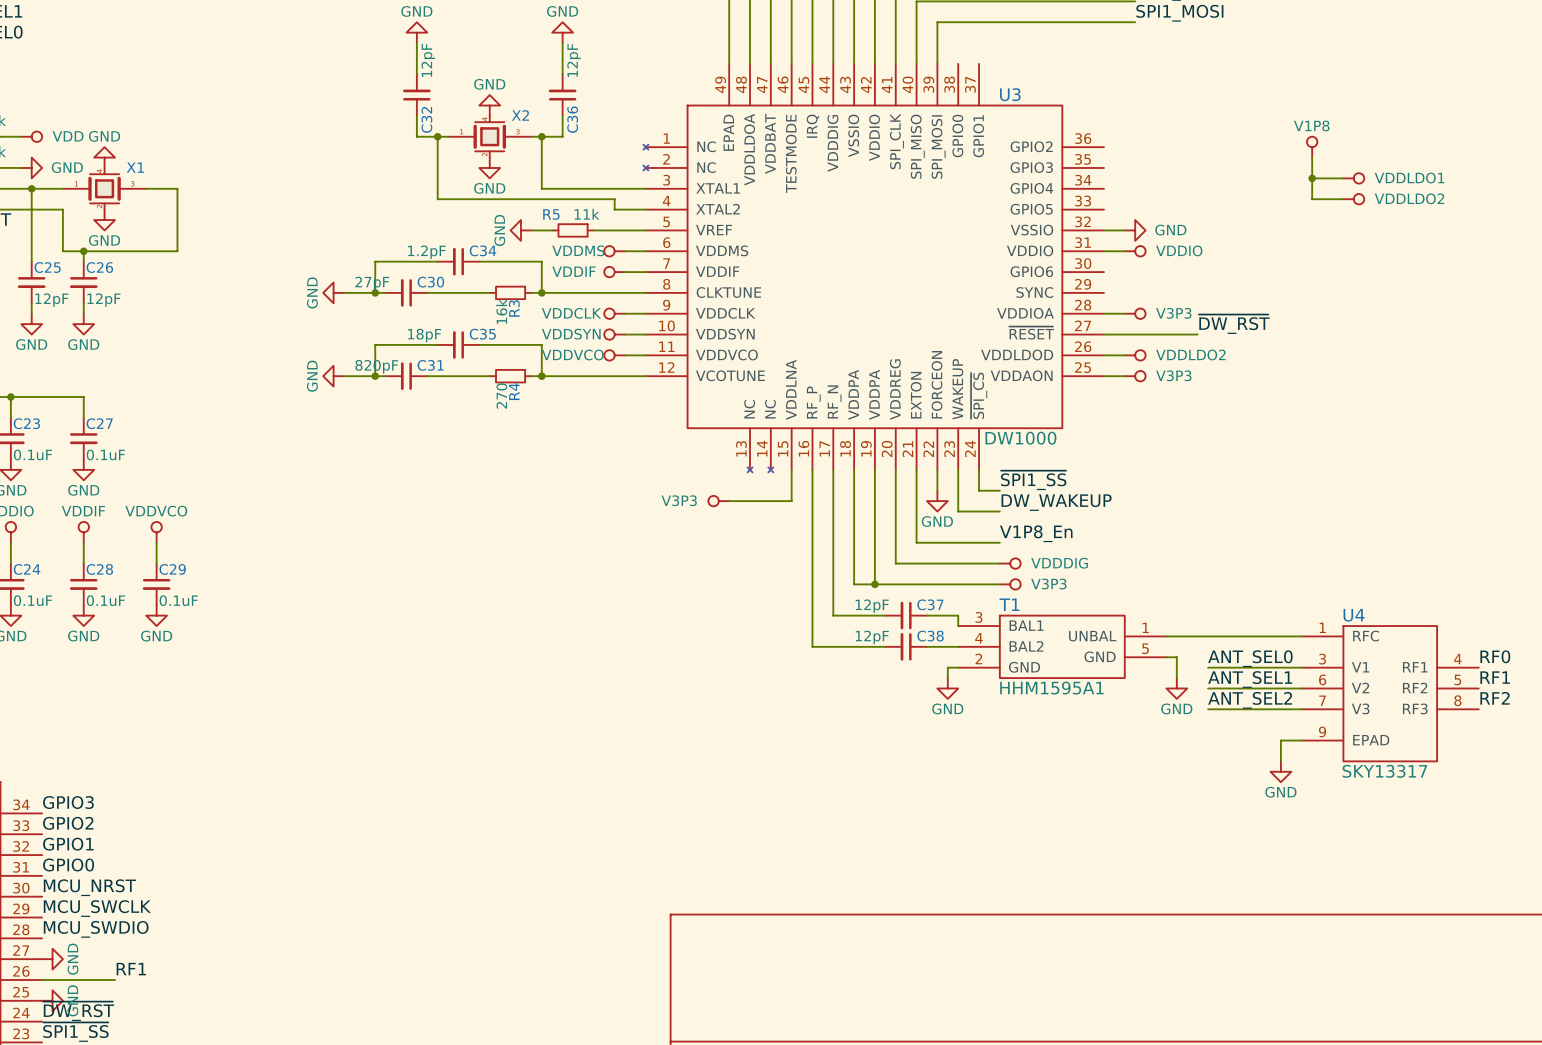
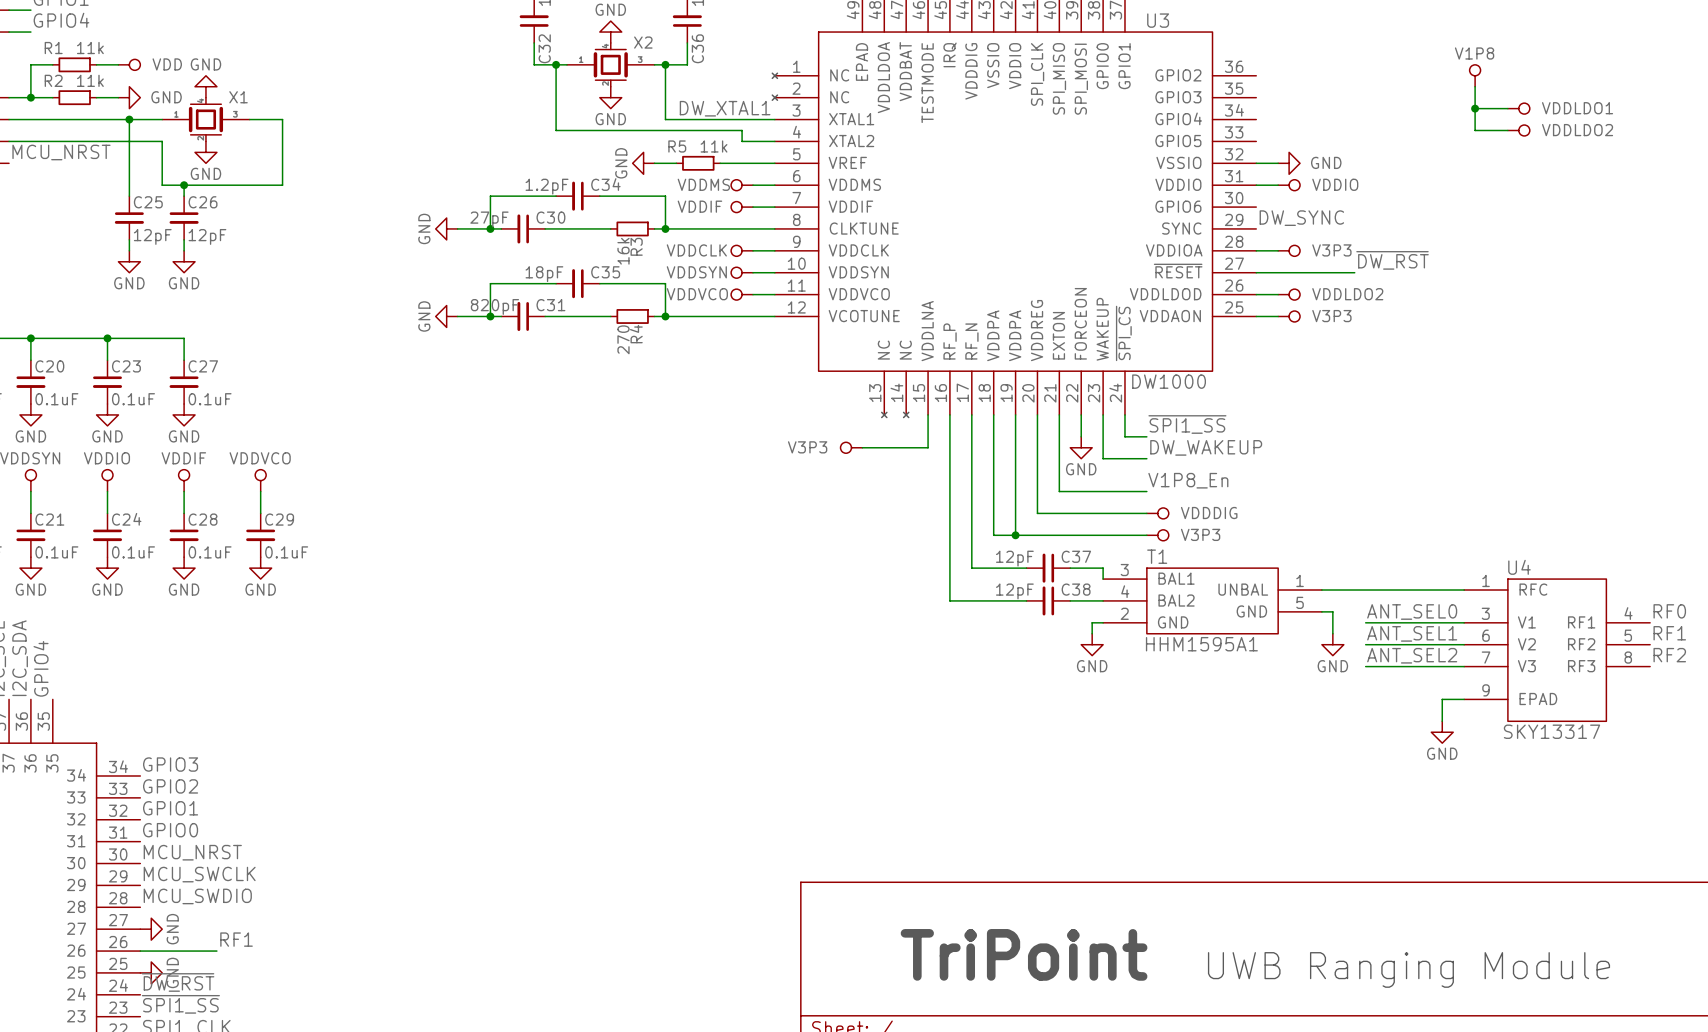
label: none -> DW_XTAL1 (725, 108)
label: none -> DW_SYNC (1301, 218)
text: none -> TriPoint (1024, 954)
text: none -> UWB Ranging Module (1408, 969)

